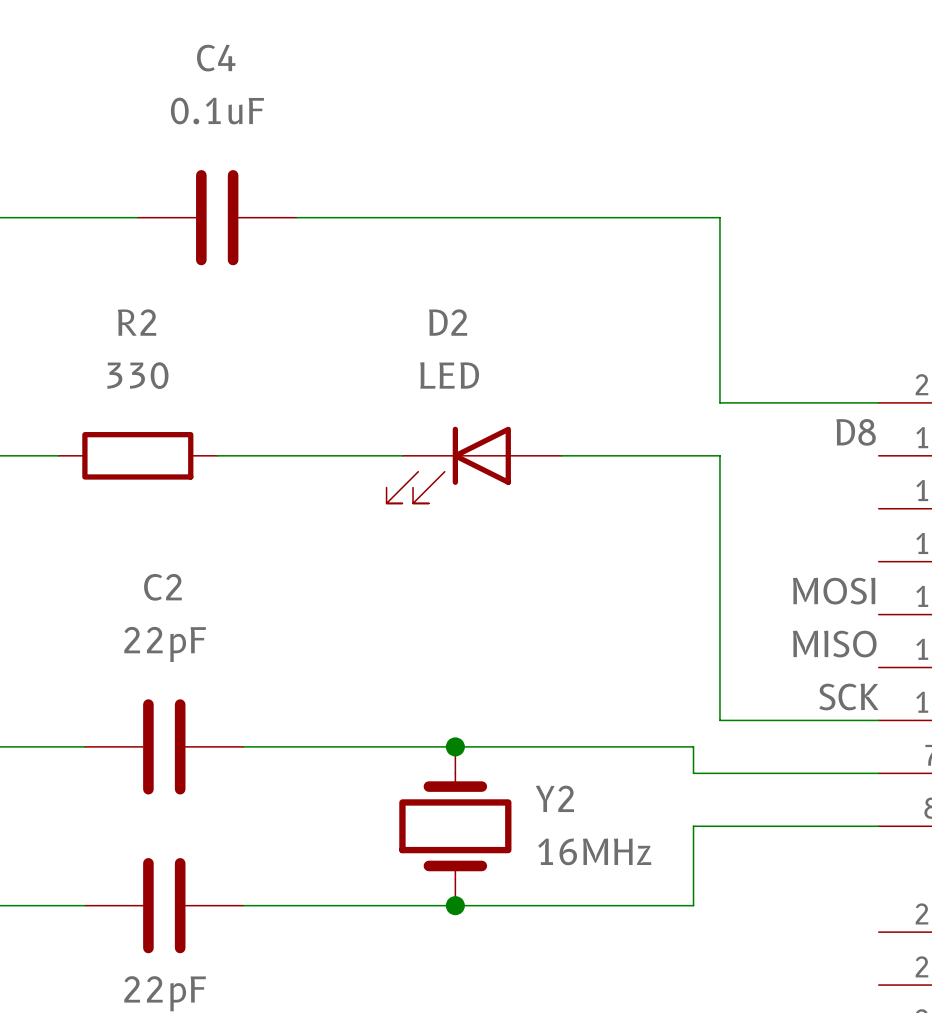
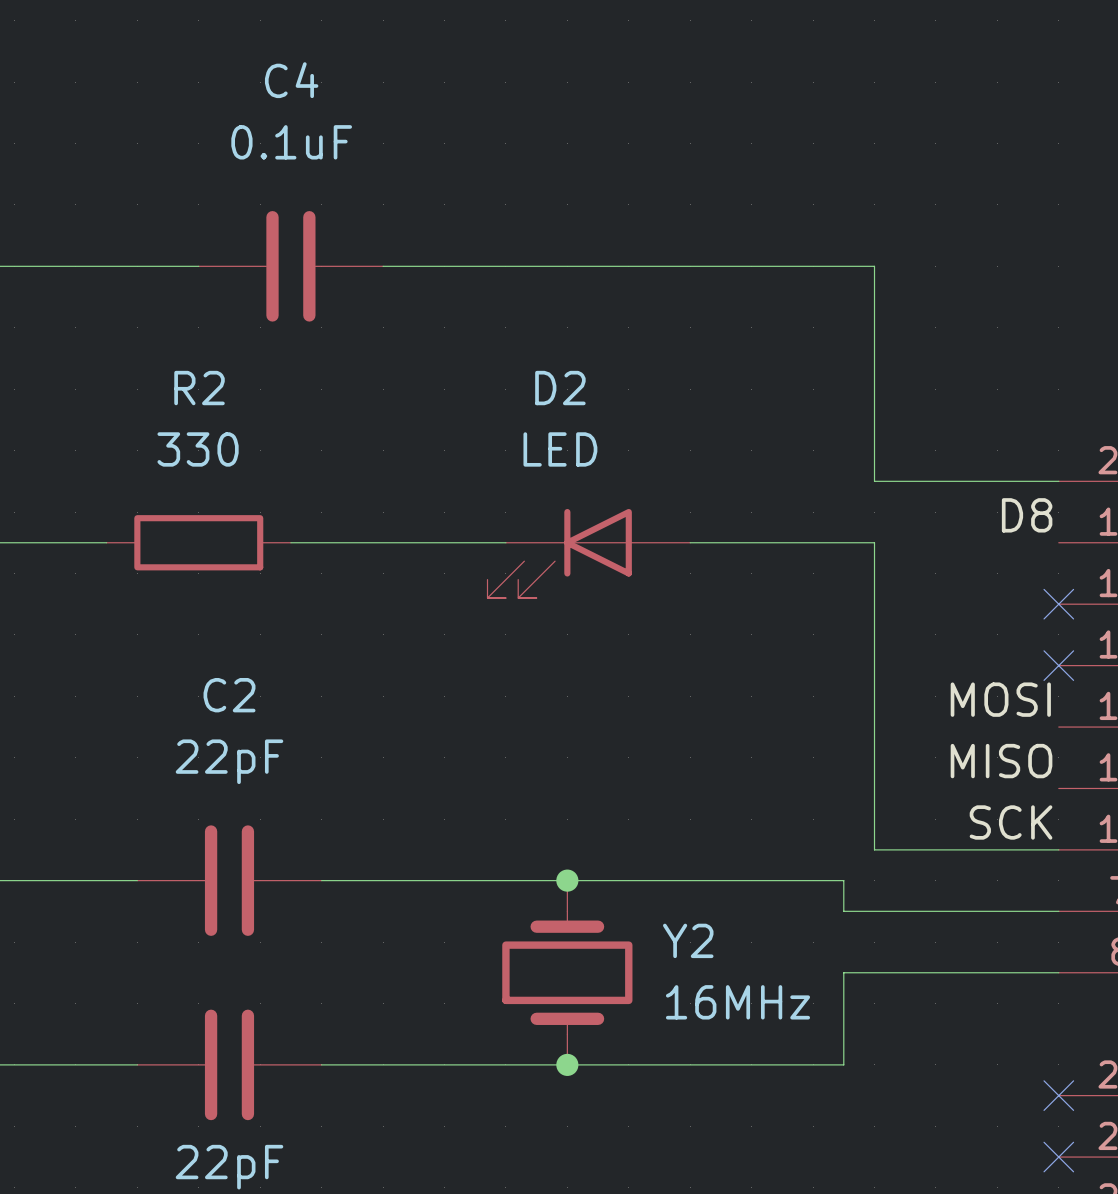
no-connect mark: none -> (1058, 604)
no-connect mark: none -> (1058, 665)
no-connect mark: none -> (1058, 1095)
no-connect mark: none -> (1058, 1157)

